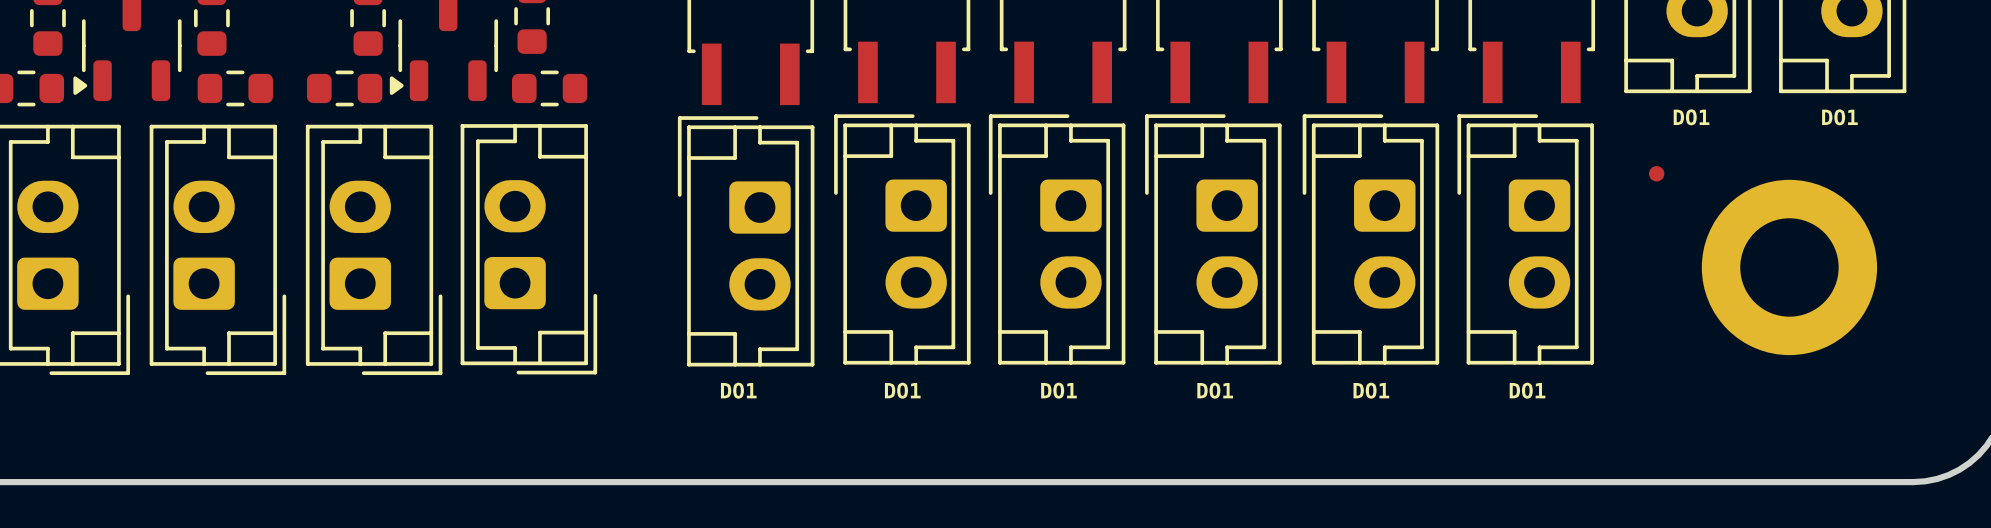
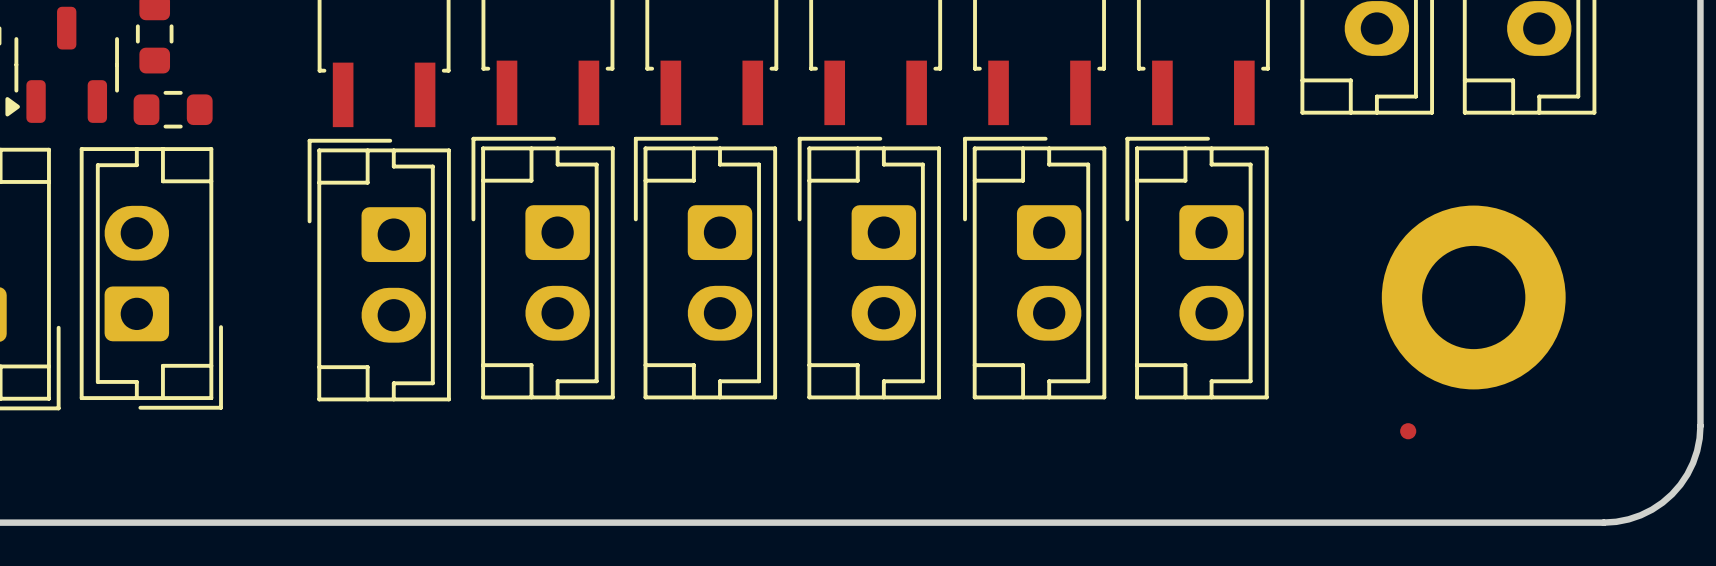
text: DO1 (1691, 117) -> none
text: DO1 (1839, 117) -> none
part position: (1656, 173) -> (1408, 431)
text: DO1 (738, 390) -> none
text: DO1 (902, 390) -> none
text: DO1 (1058, 390) -> none
text: DO1 (1215, 390) -> none
text: DO1 (1371, 390) -> none
text: DO1 (1527, 390) -> none

